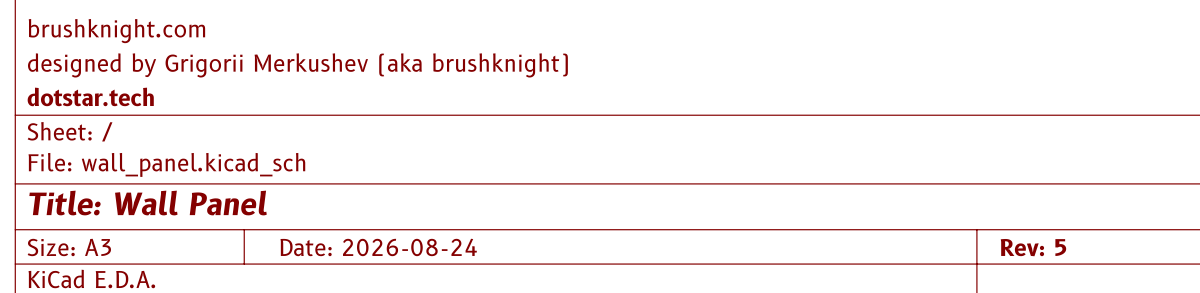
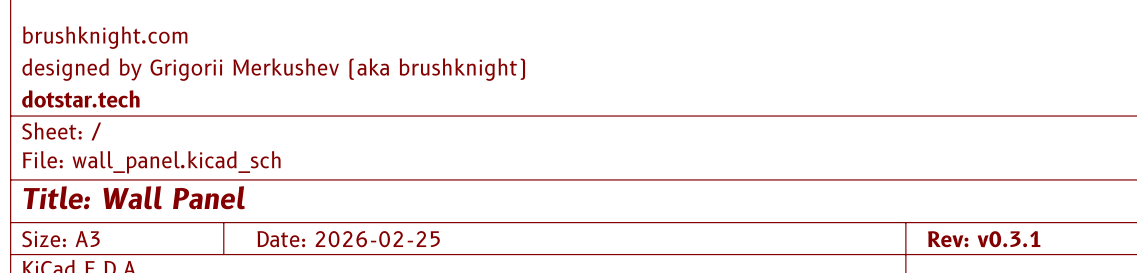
title block: Date: 2026-08-24 (378, 247) -> Date: 2026-02-25 (348, 239)
title block: Rev: 5 (1033, 247) -> Rev: v0.3.1 (984, 239)

